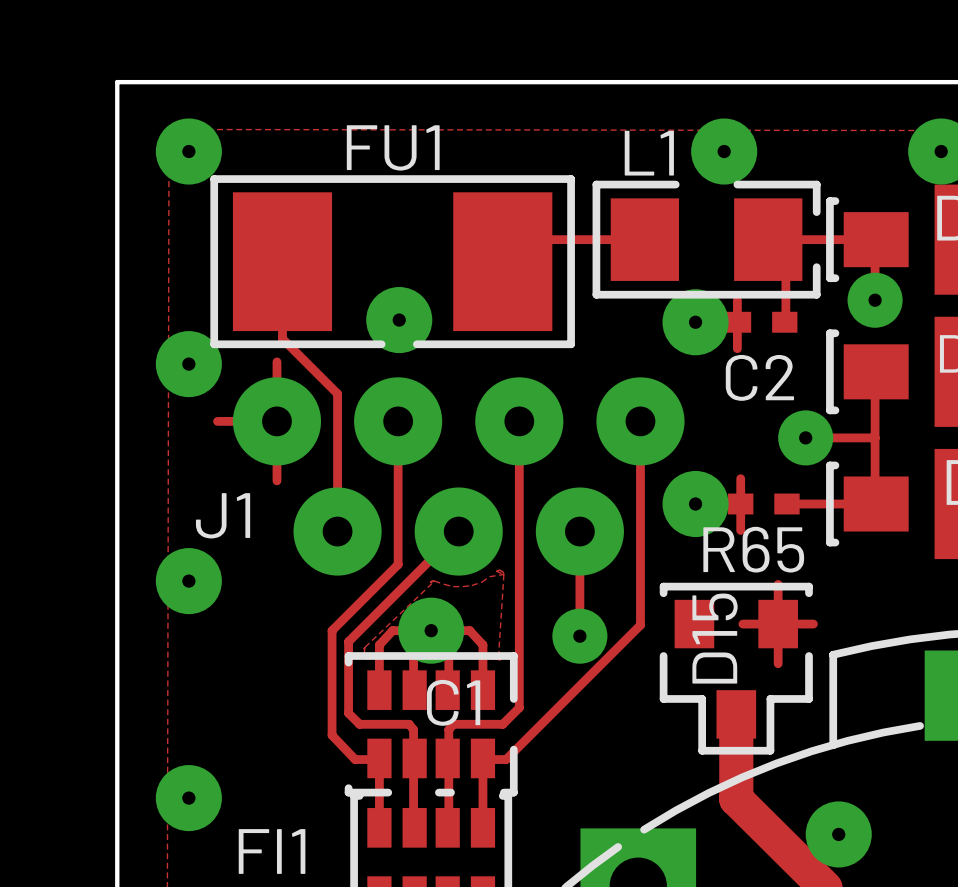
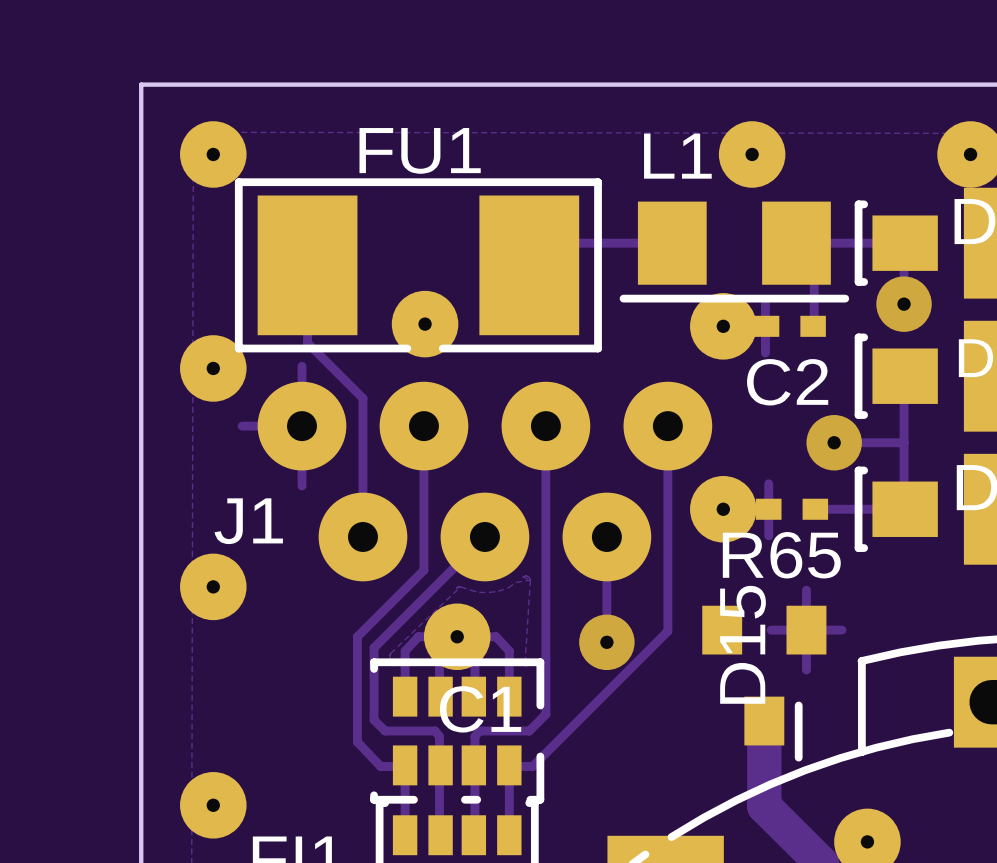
L1 footprint: [592, 180, 821, 299] -> [619, 201, 850, 303]
D15 footprint: [659, 582, 813, 755] -> [702, 605, 827, 762]

